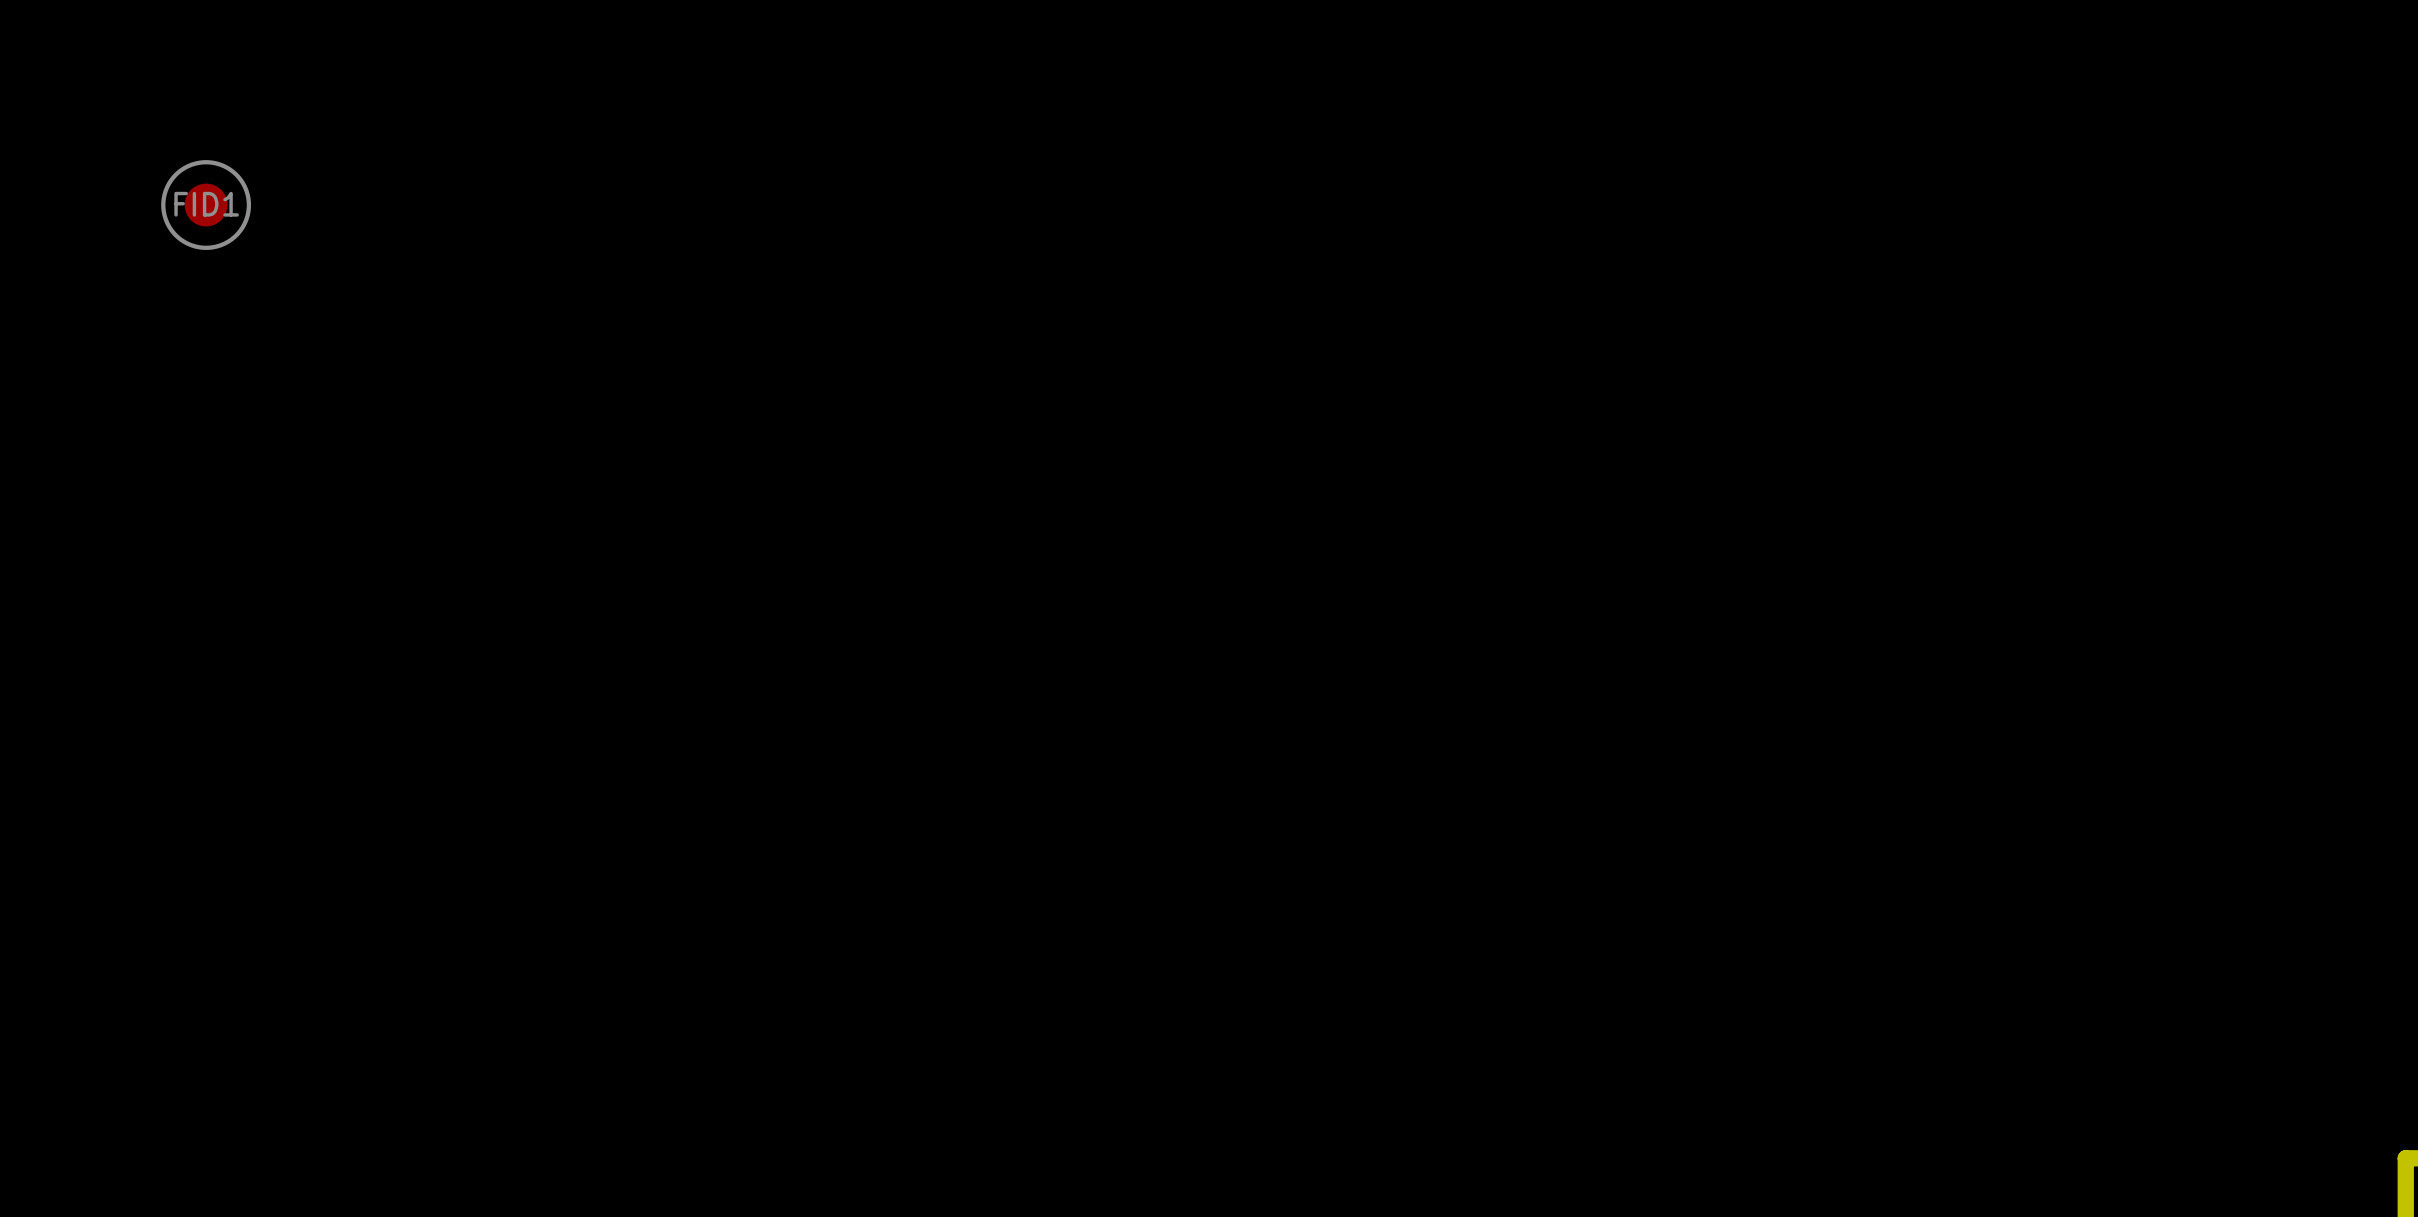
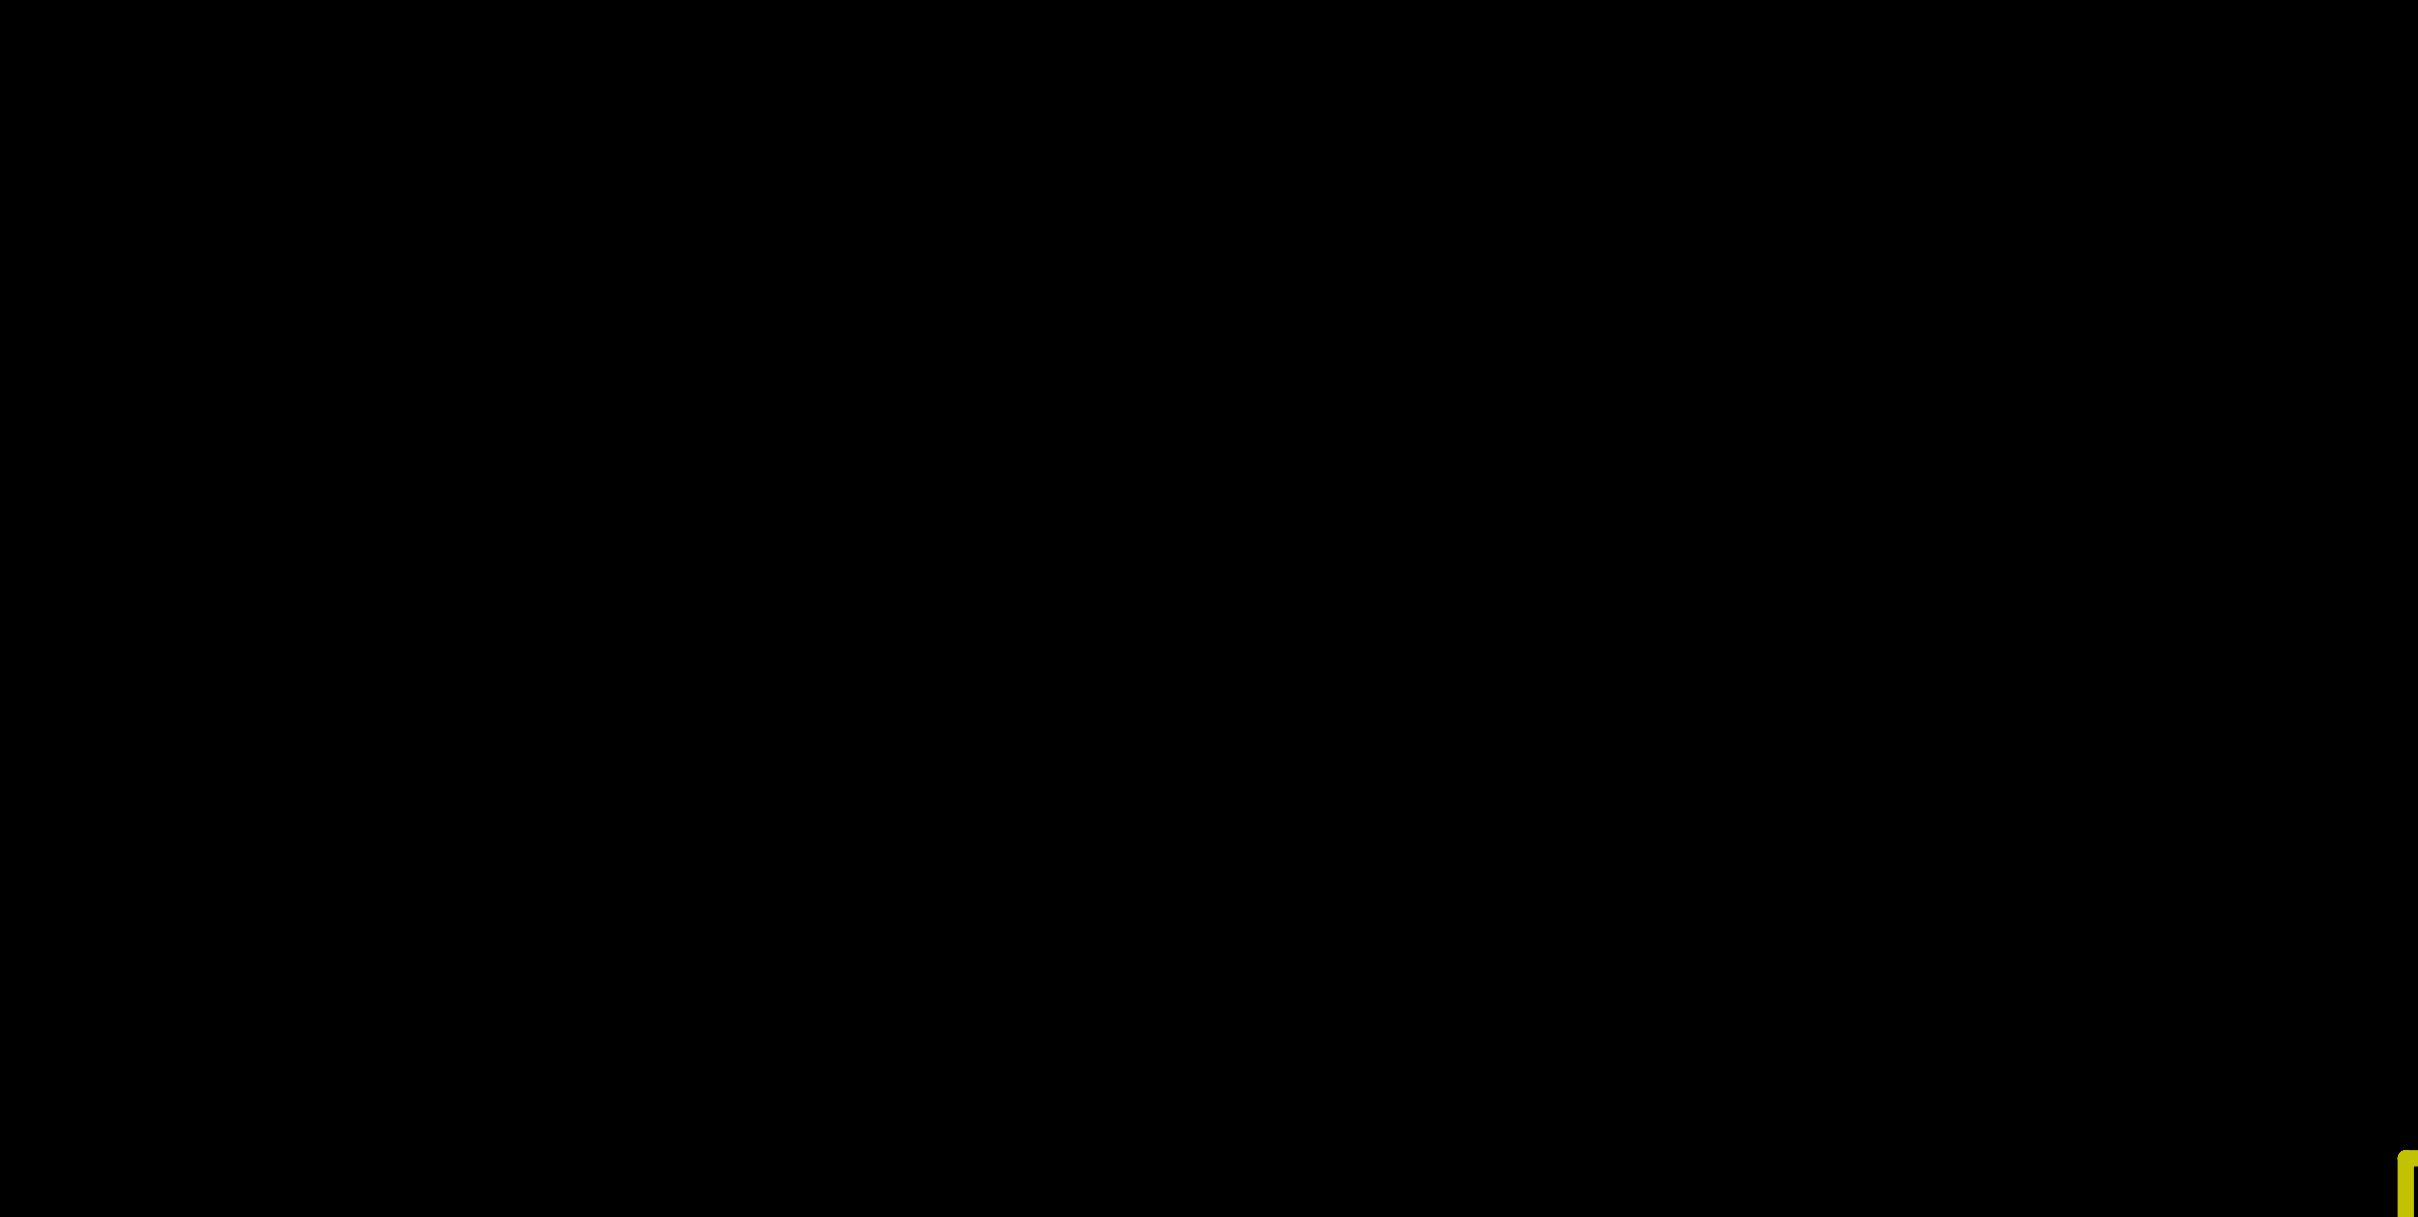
FID1: (206, 205) -> none

